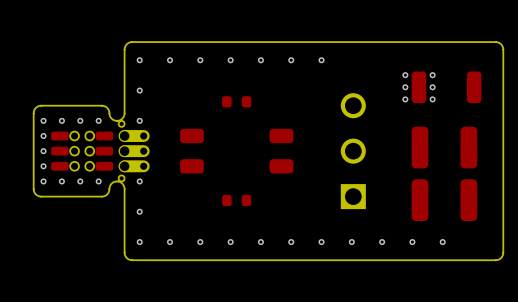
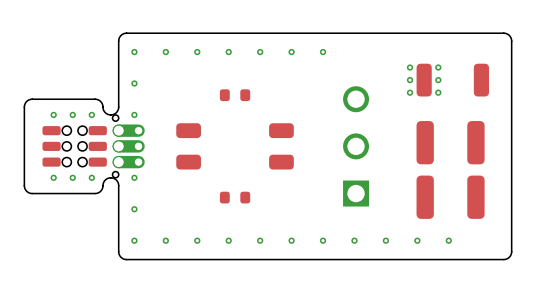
via: (43, 120) -> none
via: (43, 136) -> none
via: (43, 151) -> none
via: (43, 166) -> none
via: (43, 181) -> none

